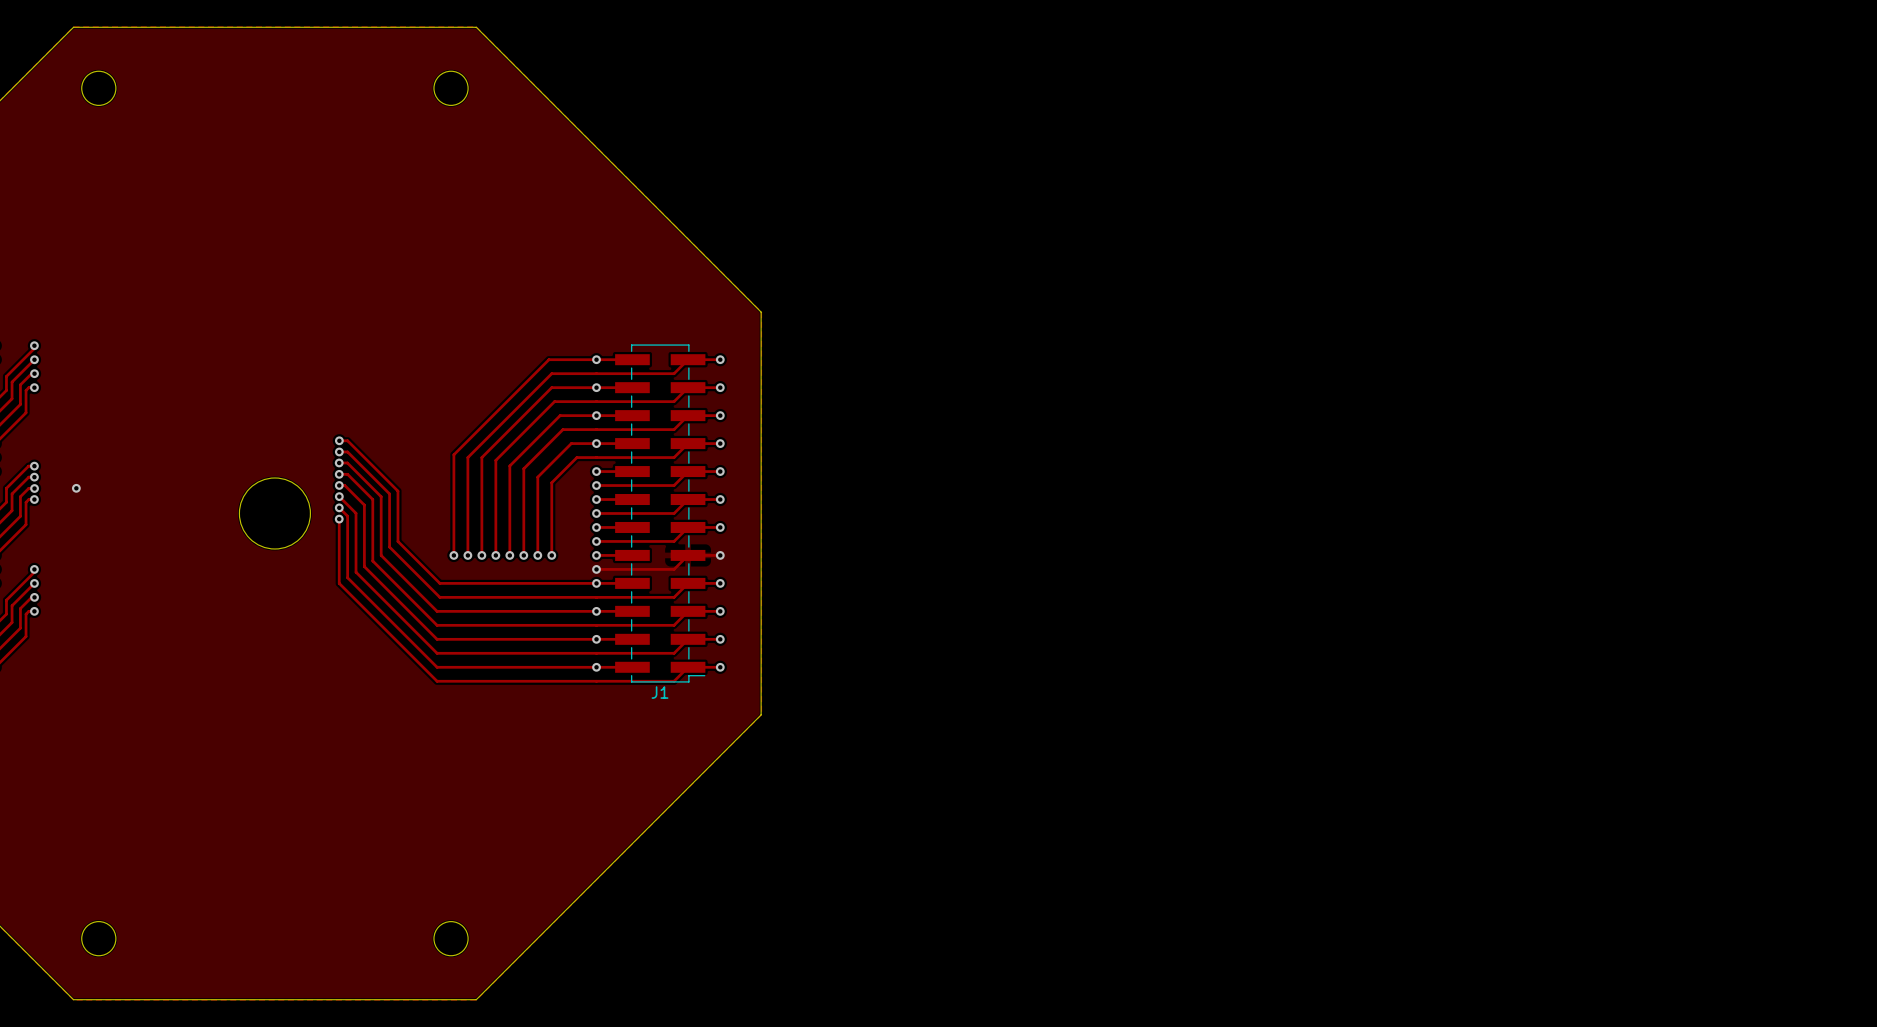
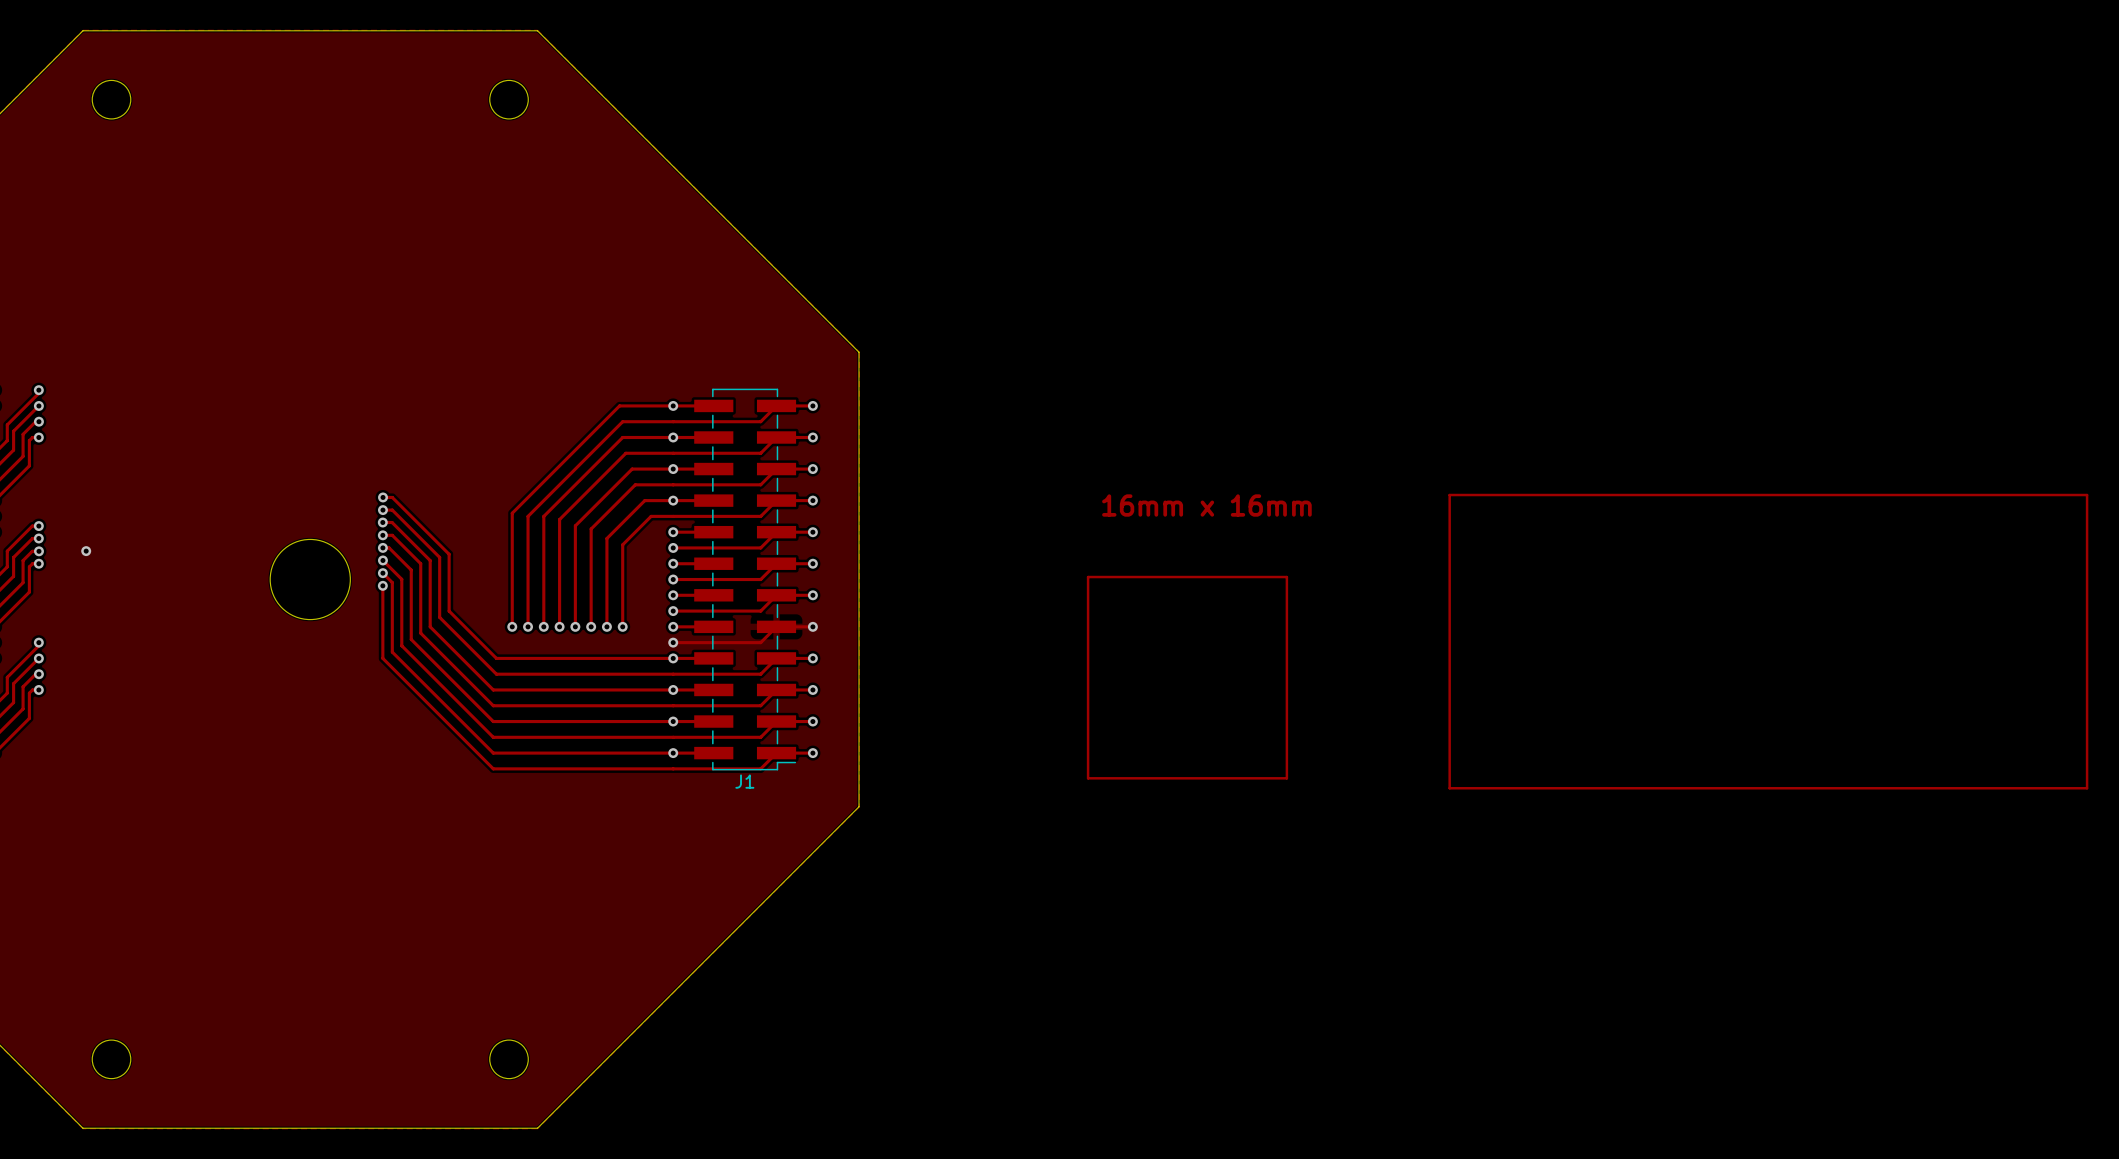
track: none -> (1449, 495) (2087, 495) (2087, 788) (1449, 788) (1449, 495)
text: none -> 16mm x 16mm (1206, 505)
track: none -> (1088, 577) (1286, 577) (1286, 778) (1088, 778) (1088, 577)

